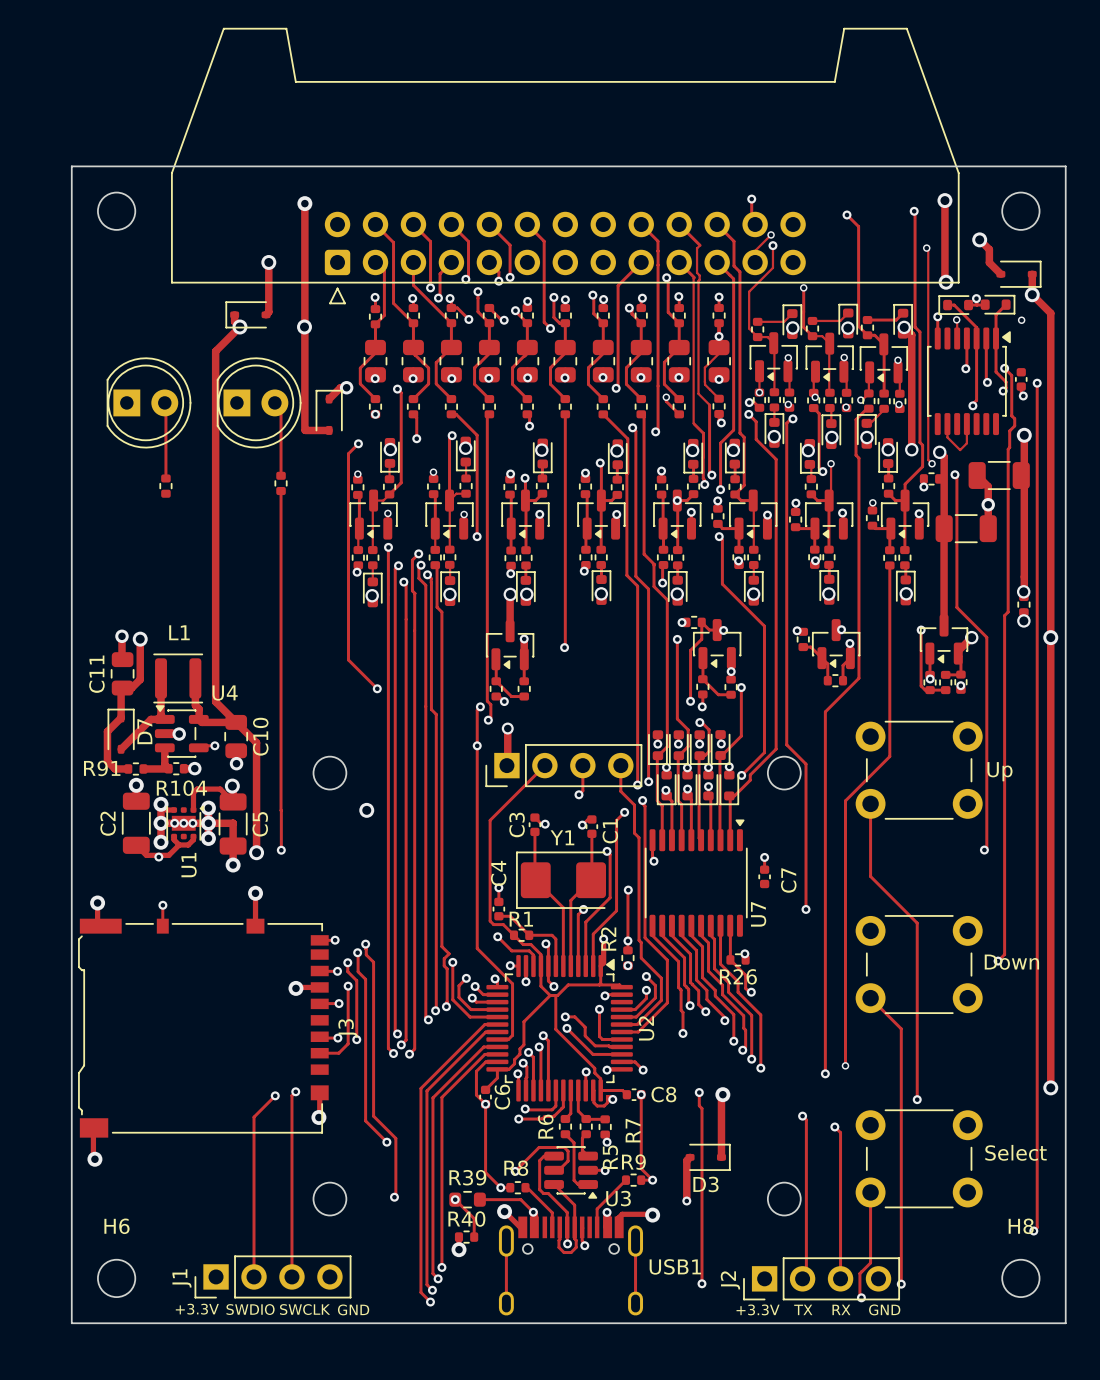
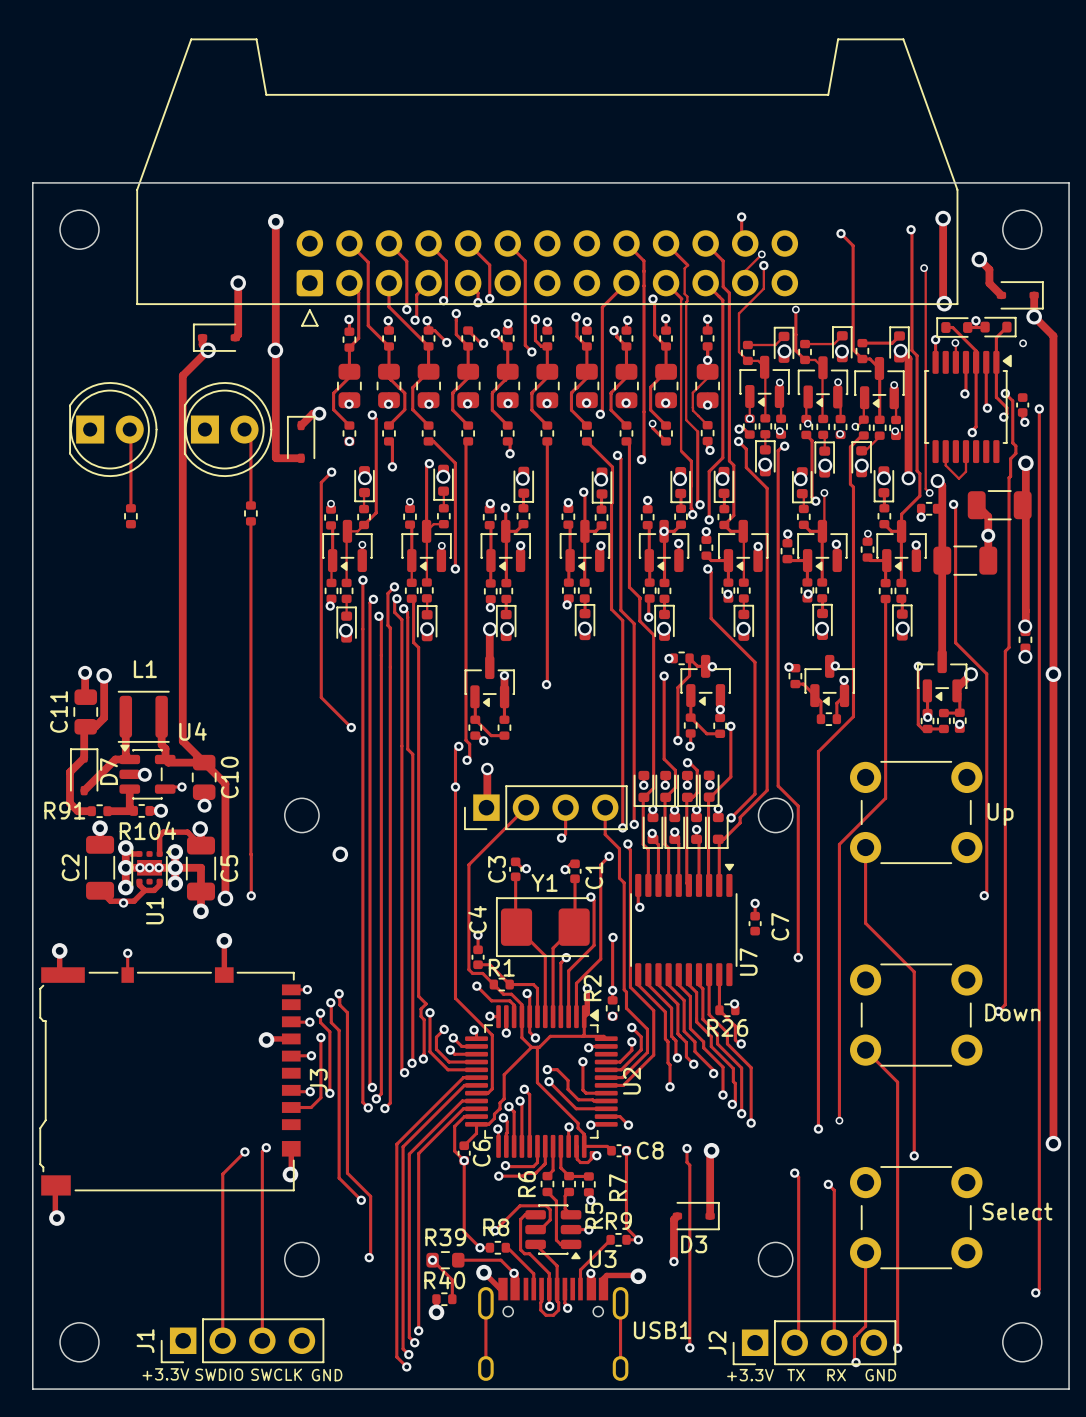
H6 name: H6 (116, 1226) -> none
H8 name: H8 (1021, 1226) -> none

